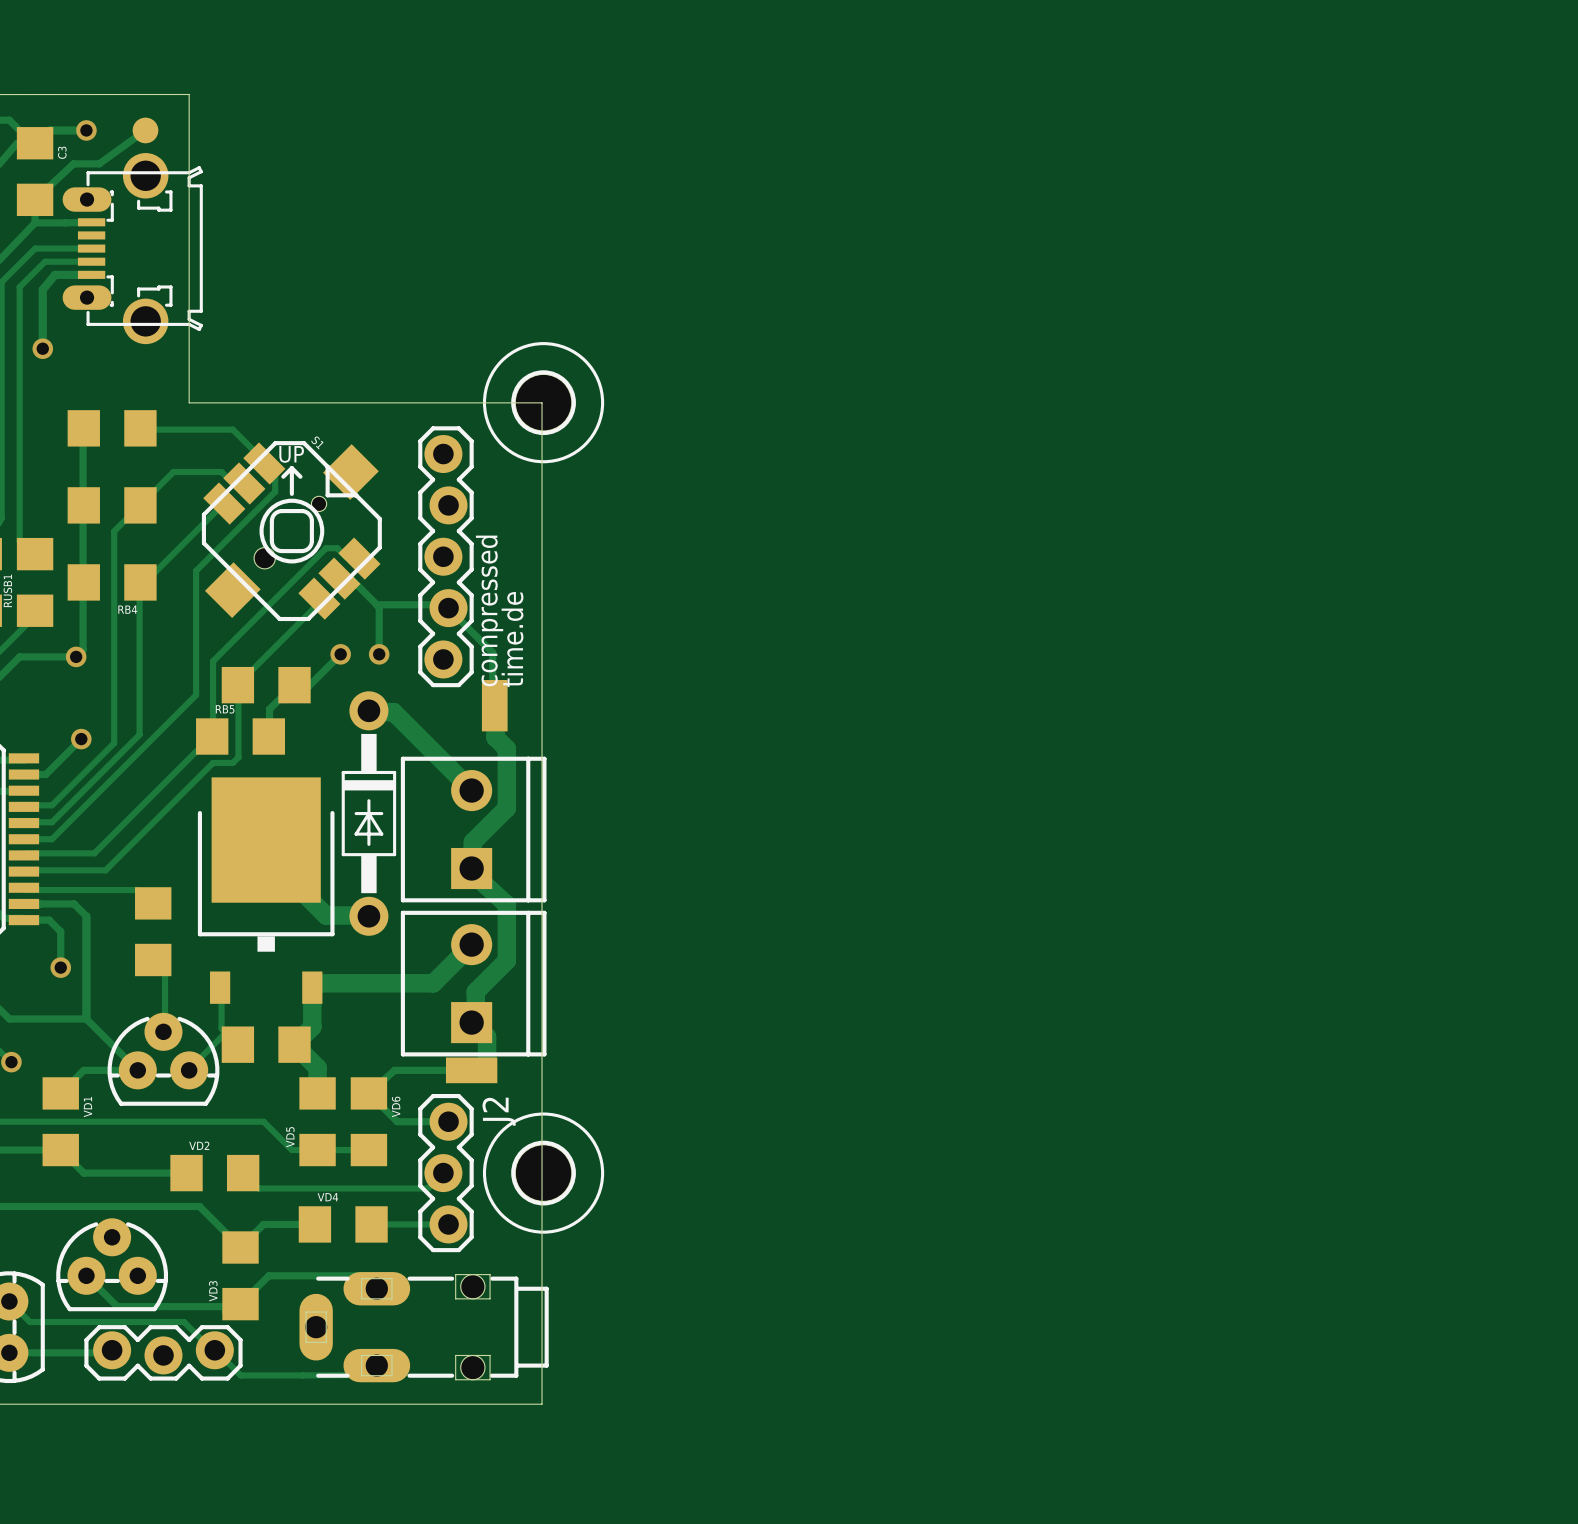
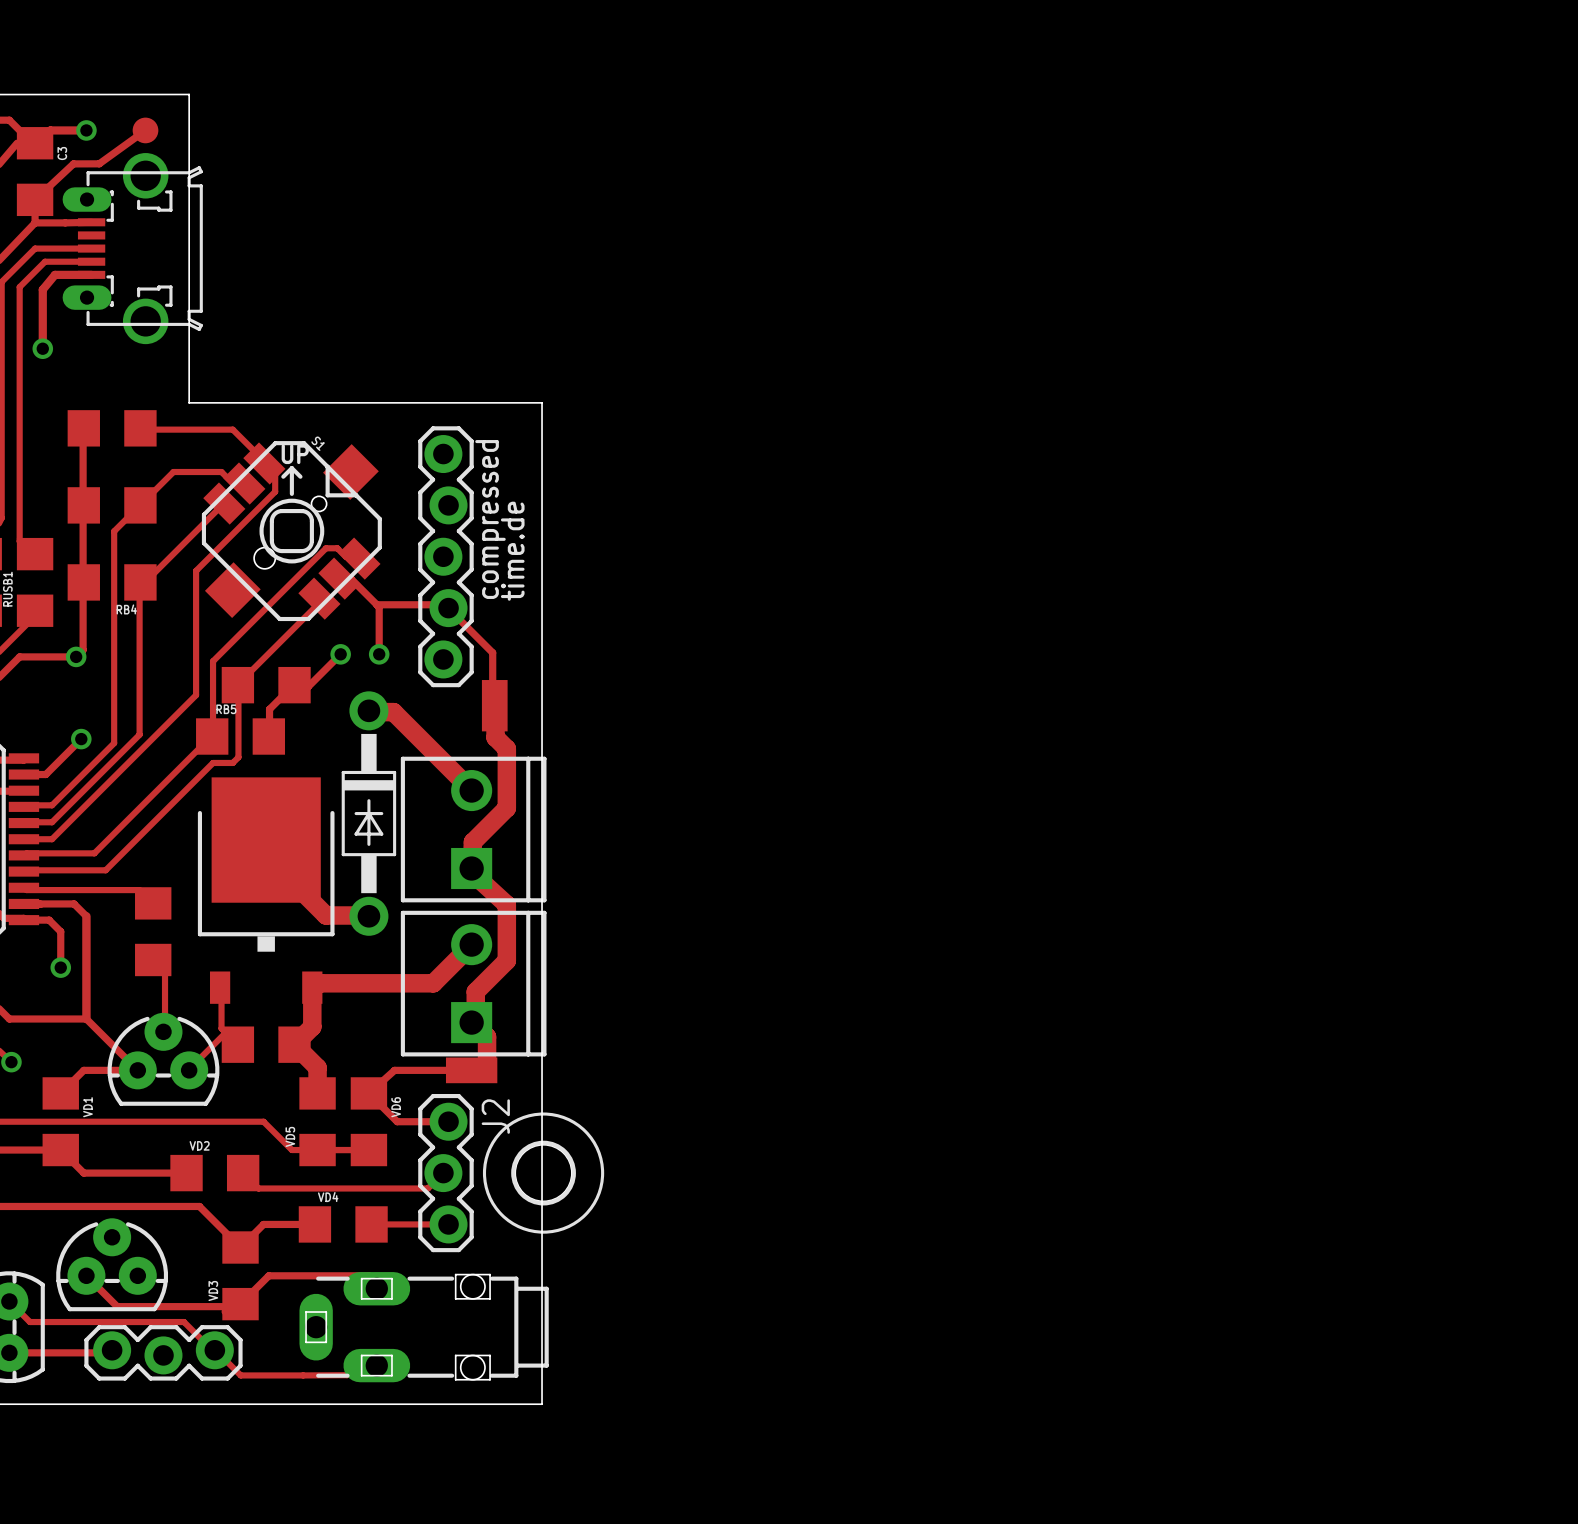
part: (543, 402) -> none
text position: compressed (489, 610) -> compressed (490, 519)
text position: time.de (512, 639) -> time.de (512, 551)

